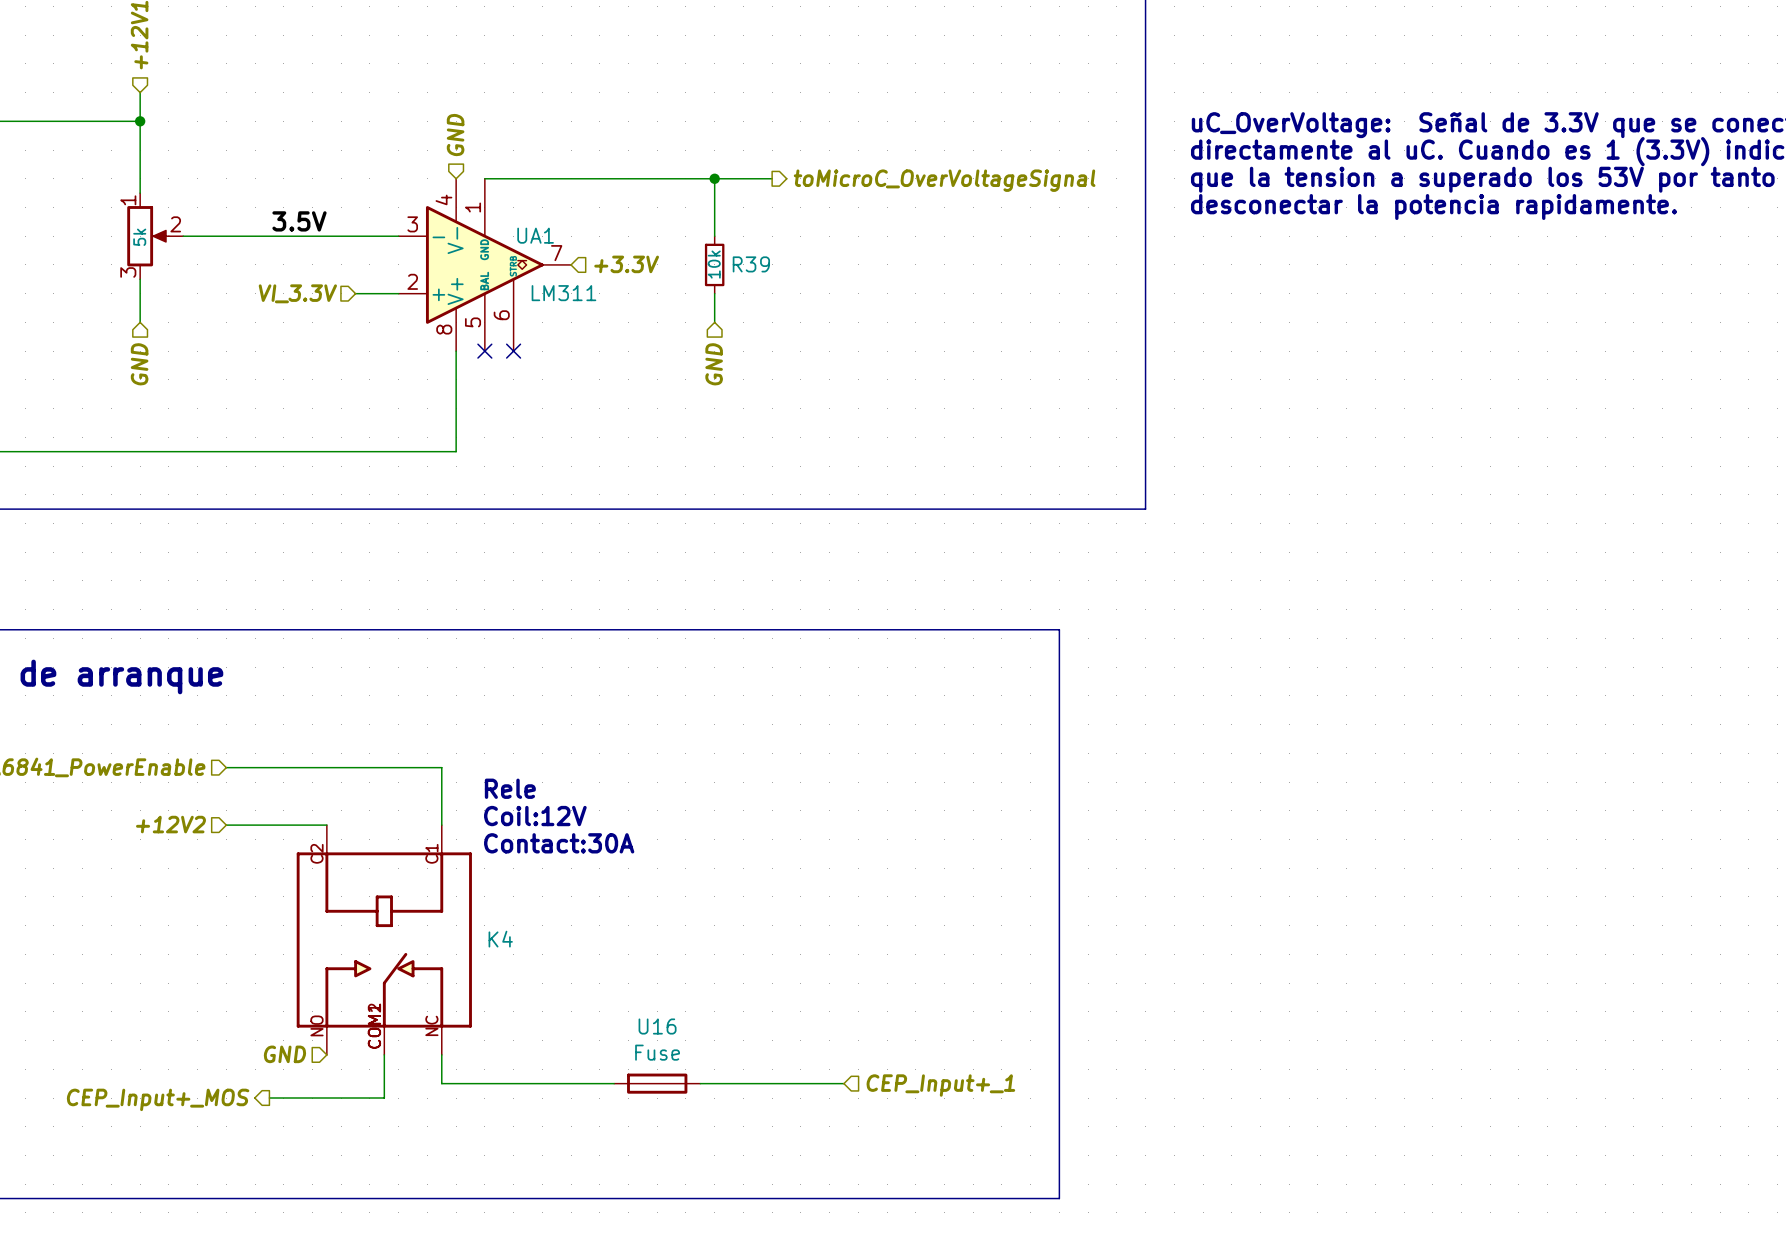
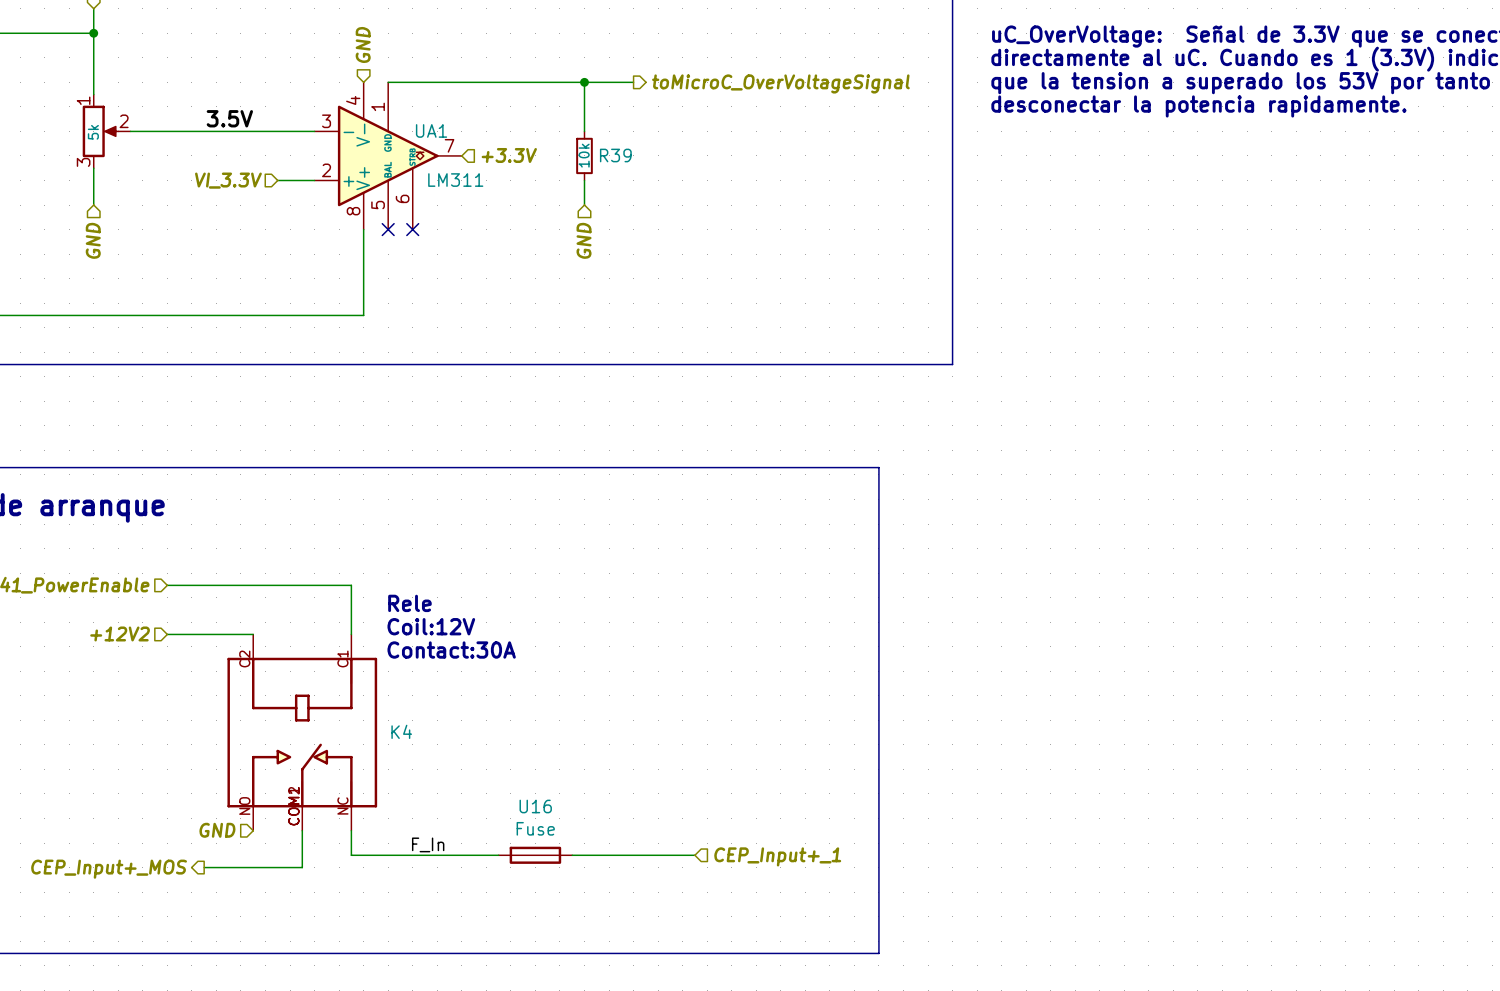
label: none -> F_In (428, 844)

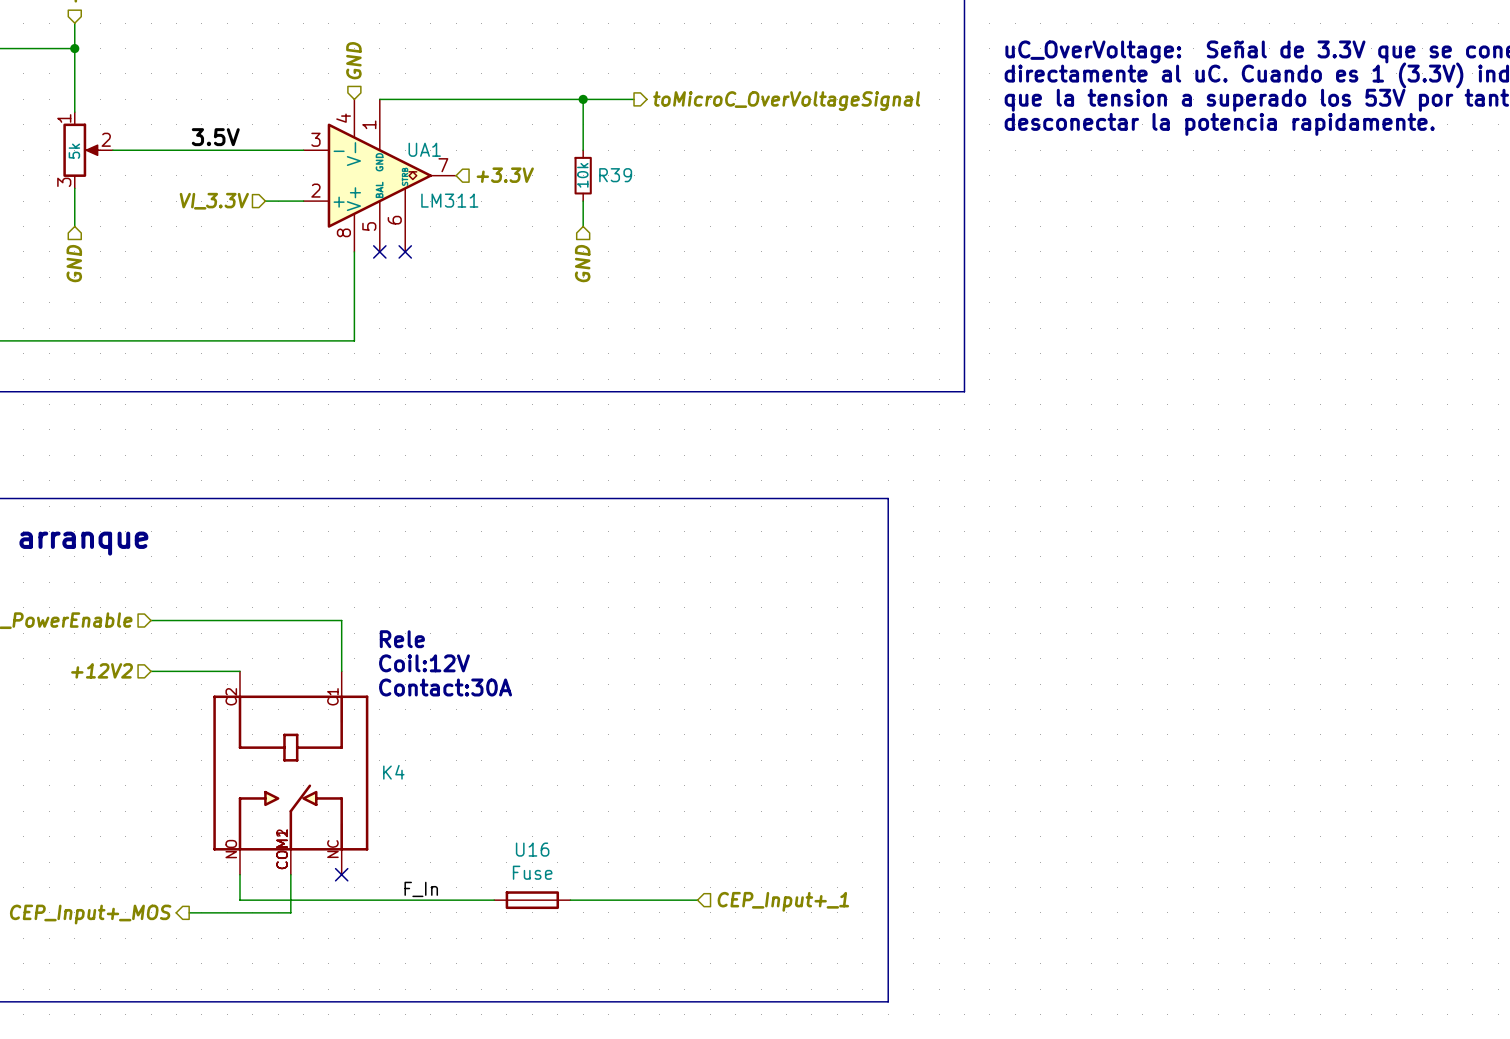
hierarchical label: GND (217, 830) -> none
wire: (351, 830) (351, 855) -> (239, 874) (239, 900) (341, 900)
no-connect mark: none -> (341, 874)

